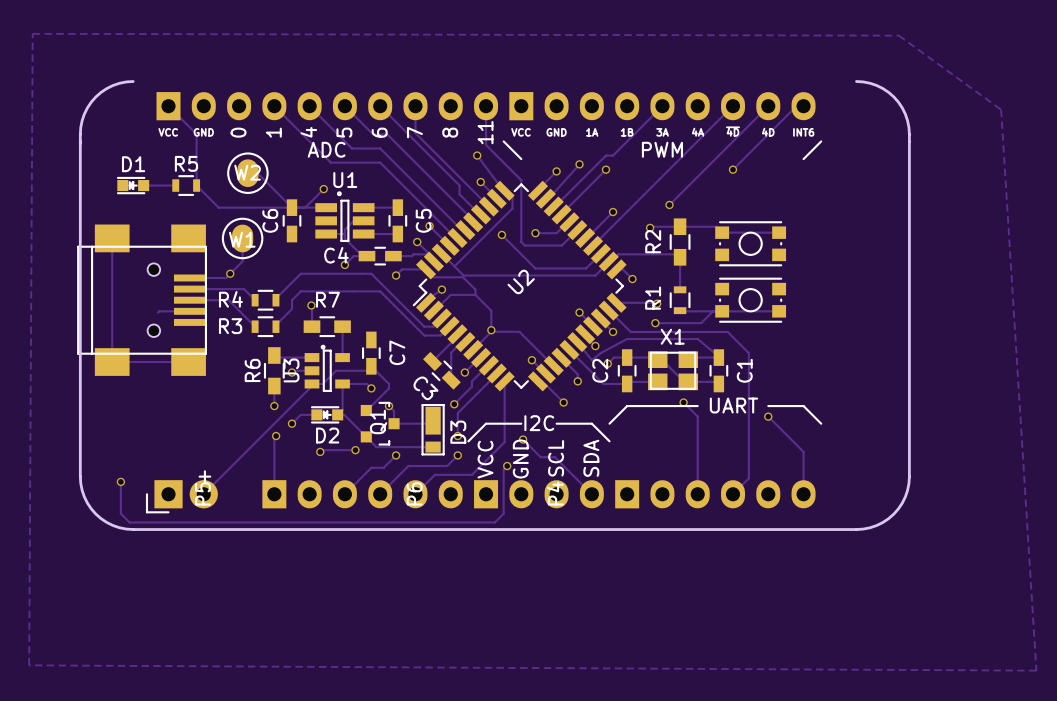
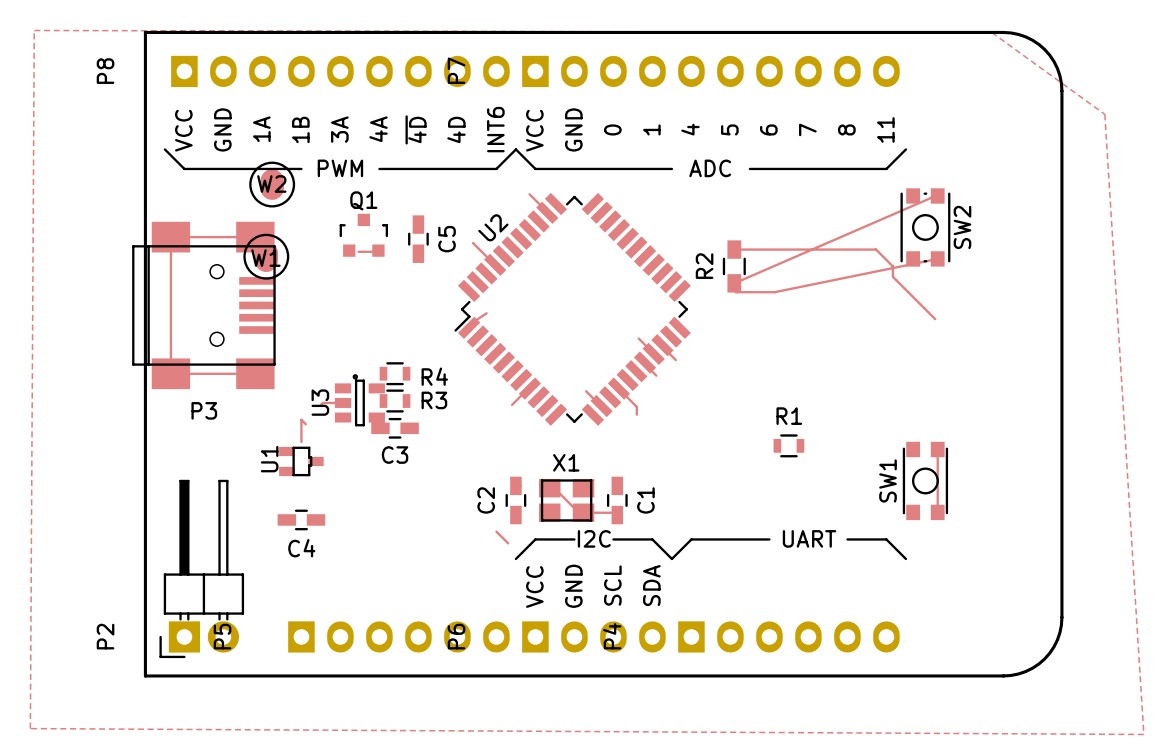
board edge: none -> (145, 32) (145, 675) (1003, 675) (1025, 671) (1039, 663) (1049, 653) (1057, 639) (1061, 617) (1061, 90) (1059, 75) (1054, 61) (1039, 44) (1018, 34) (1003, 32) (145, 32)
board edge: (133, 81) (112, 85) (95, 96) (84, 114) (80, 134) (80, 483) (87, 503) (95, 514) (112, 525) (133, 529) (856, 529) (870, 527) (882, 522) (893, 514) (902, 503) (908, 483) (909, 134) (905, 114) (893, 96) (876, 85) (856, 81) -> none
track: none -> (340, 83) (344, 83)
track: (168, 106) (196, 134) (196, 185) (218, 207) (326, 207) -> none
track: (274, 106) (330, 162) (380, 162) (457, 237) -> none
track: (309, 106) (351, 148) (380, 148) (461, 230) (465, 230) -> none
part: (327, 106) -> none
track: (344, 106) (373, 134) (387, 134) (473, 222) -> none
track: (380, 106) (459, 185) (459, 194) (481, 214) -> none
track: (415, 106) (415, 133) (488, 206) -> none
track: (486, 106) (486, 144) (521, 180) (521, 242) (524, 245) (561, 245) (577, 230) -> none
track: (662, 106) (613, 155) (605, 155) (553, 206) -> none
track: (733, 106) (593, 245) -> none
track: (768, 106) (669, 204) -> none
track: (803, 106) (796, 106) (733, 169) -> none
P8: none -> (340, 112)
P7: none -> (710, 112)
track: (662, 116) (665, 116) -> none
part: (662, 126) -> none
track: (477, 155) (503, 190) (512, 197) (512, 208) (454, 266) -> none
via: (477, 155) -> none
track: (579, 164) (548, 198) (545, 198) -> none
via: (579, 164) -> none
track: (605, 169) (561, 214) -> none
via: (605, 169) -> none
via: (733, 169) -> none
track: (556, 171) (538, 190) -> none
via: (556, 171) -> none
track: (247, 173) (257, 173) (292, 207) -> none
U1 name position: U1 (345, 180) -> U1 (269, 459)
via: (480, 182) -> none
track: none -> (937, 195) (939, 194) (734, 283)
D1: (133, 185) -> none
track: (143, 185) (175, 185) -> none
R5: (186, 185) -> none
track: (323, 189) (305, 207) -> none
via: (323, 189) -> none
U1 footprint: [315, 191, 375, 243] -> [279, 446, 324, 477]
via: (669, 204) -> none
track: (363, 207) (397, 207) -> none
track: (613, 212) (585, 237) -> none
via: (613, 212) -> none
SW2: none -> (925, 227)
track: none -> (255, 237) (170, 237) (170, 373) (255, 373)
C6: (292, 220) -> none
track: (363, 220) (353, 220) (344, 229) (344, 238) (362, 256) -> none
C5 position: (397, 220) -> (418, 239)
track: (569, 222) (556, 233) (535, 233) -> none
via: (429, 226) -> none
track: (650, 227) (716, 226) (722, 232) (779, 232) -> none
via: (650, 227) -> none
track: none -> (734, 249) (876, 249) (892, 266) (892, 276) (935, 319)
via: (535, 233) -> none
track: (363, 234) (397, 234) -> none
track: (501, 234) (535, 268) (586, 268) (600, 253) -> none
via: (501, 234) -> none
track: (112, 238) (112, 362) (188, 362) -> none
track: (233, 238) (242, 238) (242, 261) (226, 277) (189, 277) -> none
track: none -> (937, 258) (774, 292) (736, 292) (730, 286)
track: (417, 242) (433, 258) (433, 261) (426, 254) (393, 256) -> none
via: (417, 242) -> none
R2 position: (680, 242) -> (734, 266)
part: (750, 243) -> none
track: (441, 254) (463, 275) (463, 277) -> none
C4 name position: C4 (336, 255) -> C4 (301, 548)
track: (367, 256) (353, 256) (344, 264) -> none
C4 position: (380, 256) -> (301, 519)
via: (344, 264) -> none
track: (616, 269) (622, 269) (632, 279) -> none
via: (230, 273) -> none
track: (396, 275) (402, 269) (426, 269) (433, 277) (463, 277) -> none
via: (396, 275) -> none
track: (463, 275) (595, 275) (618, 254) (677, 254) (680, 257) (680, 289) -> none
track: (463, 277) (475, 289) (475, 294) -> none
via: (632, 279) -> none
U2 name position: U2 (521, 281) -> U2 (493, 227)
P3: none -> (203, 305)
track: (189, 289) (244, 289) (255, 300) (255, 303) -> none
via: (441, 289) -> none
track: (475, 294) (450, 294) (433, 310) -> none
track: (475, 294) (491, 310) (491, 331) -> none
R4 name position: R4 (230, 299) -> R4 (434, 376)
part: (142, 300) -> none
track: (189, 300) (228, 300) (255, 326) -> none
R4 position: (265, 300) -> (395, 373)
R1 rotation: 0° (680, 300) -> 90° clockwise (788, 445)
R1 position: (680, 300) -> (788, 445)
part: (750, 300) -> none
track: (275, 301) (275, 298) (300, 273) (371, 273) (424, 326) (433, 326) (441, 318) -> none
track: (616, 302) (657, 303) -> none
via: (657, 303) -> none
track: (311, 305) (312, 326) -> none
via: (311, 305) -> none
track: (608, 310) (630, 331) (727, 331) (748, 353) (748, 478) (733, 494) -> none
track: (680, 310) (779, 311) -> none
track: (189, 311) (157, 312) -> none
track: (713, 311) (701, 323) (655, 323) -> none
via: (579, 312) -> none
via: (655, 323) -> none
R3 name position: R3 (230, 326) -> R3 (434, 400)
R3 position: (265, 326) -> (395, 401)
R7: (327, 326) -> none
track: (342, 326) (342, 357) -> none
track: (449, 326) (440, 335) (424, 335) (380, 291) (300, 291) (292, 300) (292, 309) (275, 326) -> none
via: (491, 330) -> none
track: (491, 331) (519, 331) (553, 365) -> none
track: (491, 331) (473, 349) -> none
via: (613, 331) -> none
track: (457, 334) (457, 336) (432, 361) -> none
track: (465, 342) (461, 342) (451, 352) (451, 380) -> none
track: (577, 342) (591, 360) (600, 353) (627, 339) (697, 339) (718, 357) -> none
via: (595, 346) -> none
track: (571, 349) (569, 349) (603, 383) (657, 381) -> none
C7: (371, 353) -> none
track: (274, 355) (276, 357) (312, 357) -> none
track: (718, 357) (690, 357) (688, 359) (691, 359) -> none
via: (531, 360) -> none
track: (607, 363) (613, 357) (655, 357) (661, 359) (684, 381) (716, 381) (718, 383) -> none
via: (607, 363) -> none
track: (488, 365) (471, 381) (471, 386) (454, 404) -> none
R6: (274, 370) -> none
C3 rotation: 0° (441, 370) -> 45° counterclockwise (395, 428)
C3 position: (441, 370) -> (395, 428)
C2 position: (627, 370) -> (515, 500)
X1 position: (673, 370) -> (566, 500)
C1 position: (718, 370) -> (617, 500)
via: (292, 372) -> none
via: (464, 372) -> none
track: (496, 373) (457, 413) (457, 436) -> none
track: (504, 381) (504, 442) (471, 474) (434, 474) (415, 494) -> none
track: (538, 381) (542, 381) (563, 402) -> none
via: (577, 381) -> none
track: (371, 388) (366, 383) (342, 383) (342, 410) (337, 414) (344, 414) (376, 447) (433, 447) -> none
via: (371, 388) -> none
via: (563, 402) -> none
track: (683, 402) (697, 416) (697, 494) -> none
via: (683, 402) -> none
via: (454, 404) -> none
via: (274, 406) -> none
track: (389, 406) (394, 411) (394, 423) (430, 423) (433, 420) -> none
via: (389, 406) -> none
track: (366, 410) (389, 388) (389, 383) (371, 366) (366, 370) (336, 370) (322, 383) (312, 383) (203, 494) -> none
track: none -> (937, 449) (937, 512)
track: (316, 414) (300, 414) (292, 423) -> none
D2: (327, 414) -> none
track: (768, 416) (803, 451) (803, 494) -> none
via: (768, 416) -> none
Q1 name position: Q1 (378, 421) -> Q1 (363, 200)
P6 footprint: [467, 422, 611, 509] -> [514, 538, 674, 653]
via: (292, 423) -> none
Q1 rotation: 0° (380, 423) -> 90° counterclockwise (363, 235)
Q1 position: (380, 423) -> (363, 235)
D3: (433, 429) -> none
track: (276, 436) (274, 437) (274, 494) -> none
via: (276, 436) -> none
via: (457, 436) -> none
track: (523, 439) (540, 457) (554, 457) (591, 494) -> none
via: (523, 439) -> none
SW1: none -> (925, 480)
track: none -> (549, 488) (554, 488) (578, 512) (615, 512) (617, 515)
track: (355, 450) (321, 450) (320, 451) -> none
via: (355, 450) -> none
via: (320, 451) -> none
track: (396, 455) (383, 467) (371, 467) (344, 494) -> none
via: (396, 455) -> none
track: (457, 455) (447, 466) (408, 466) (380, 494) -> none
via: (457, 455) -> none
P4 position: (715, 456) -> (788, 595)
track: (507, 466) (503, 469) (503, 513) (494, 522) (129, 522) (120, 513) (120, 481) -> none
via: (507, 466) -> none
via: (120, 481) -> none
track: none -> (496, 531) (508, 543)
P5 position: (362, 494) -> (398, 636)
part: (181, 496) -> none
P2: none -> (201, 568)

